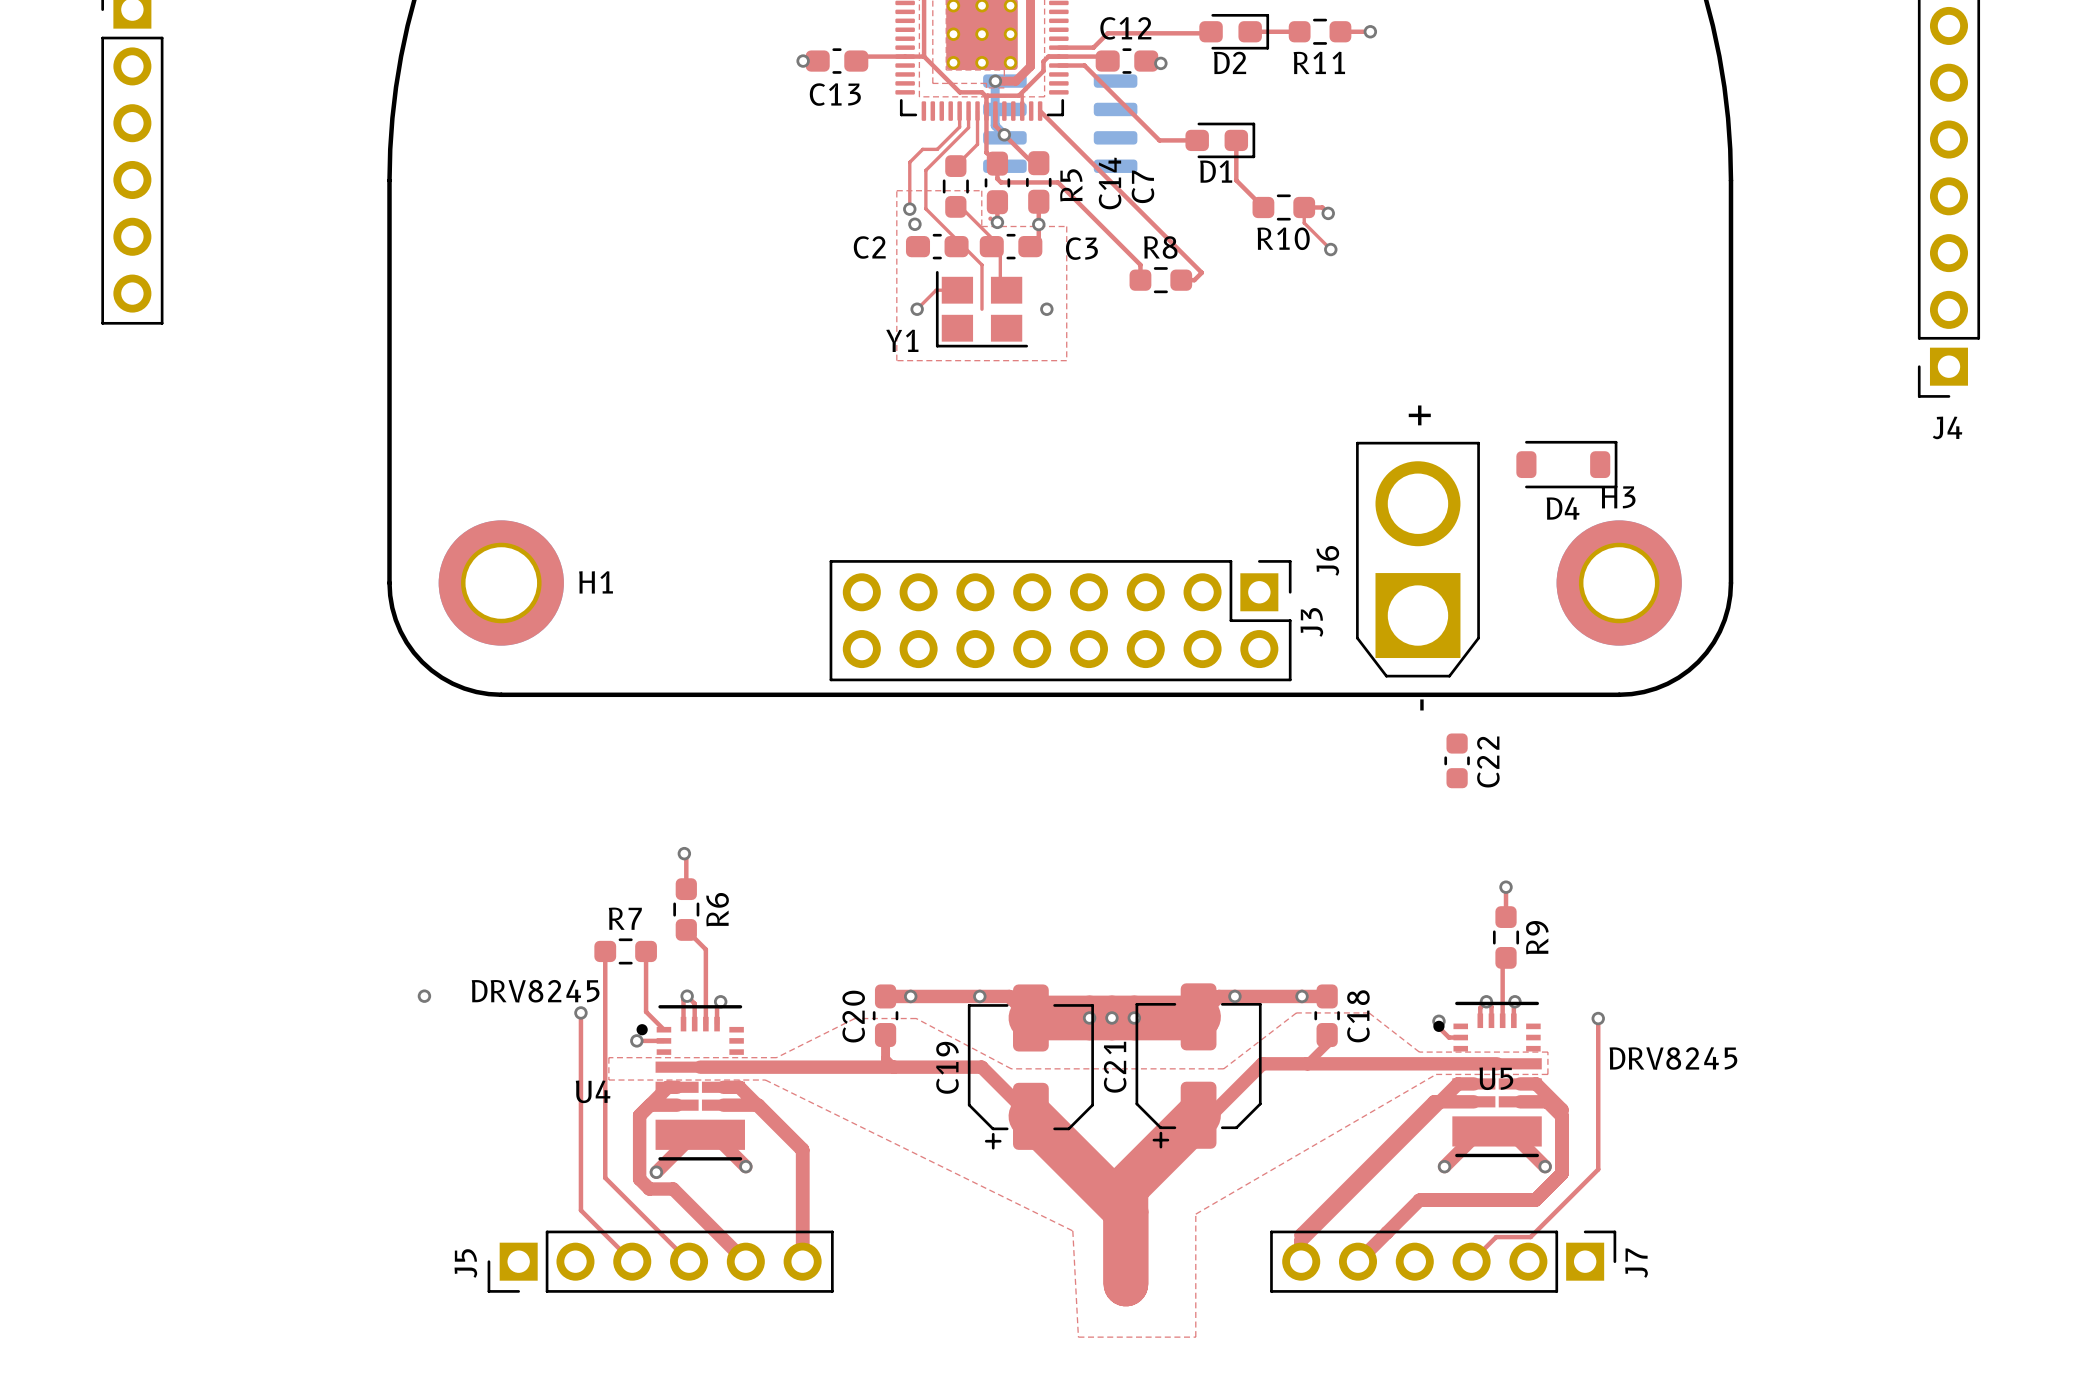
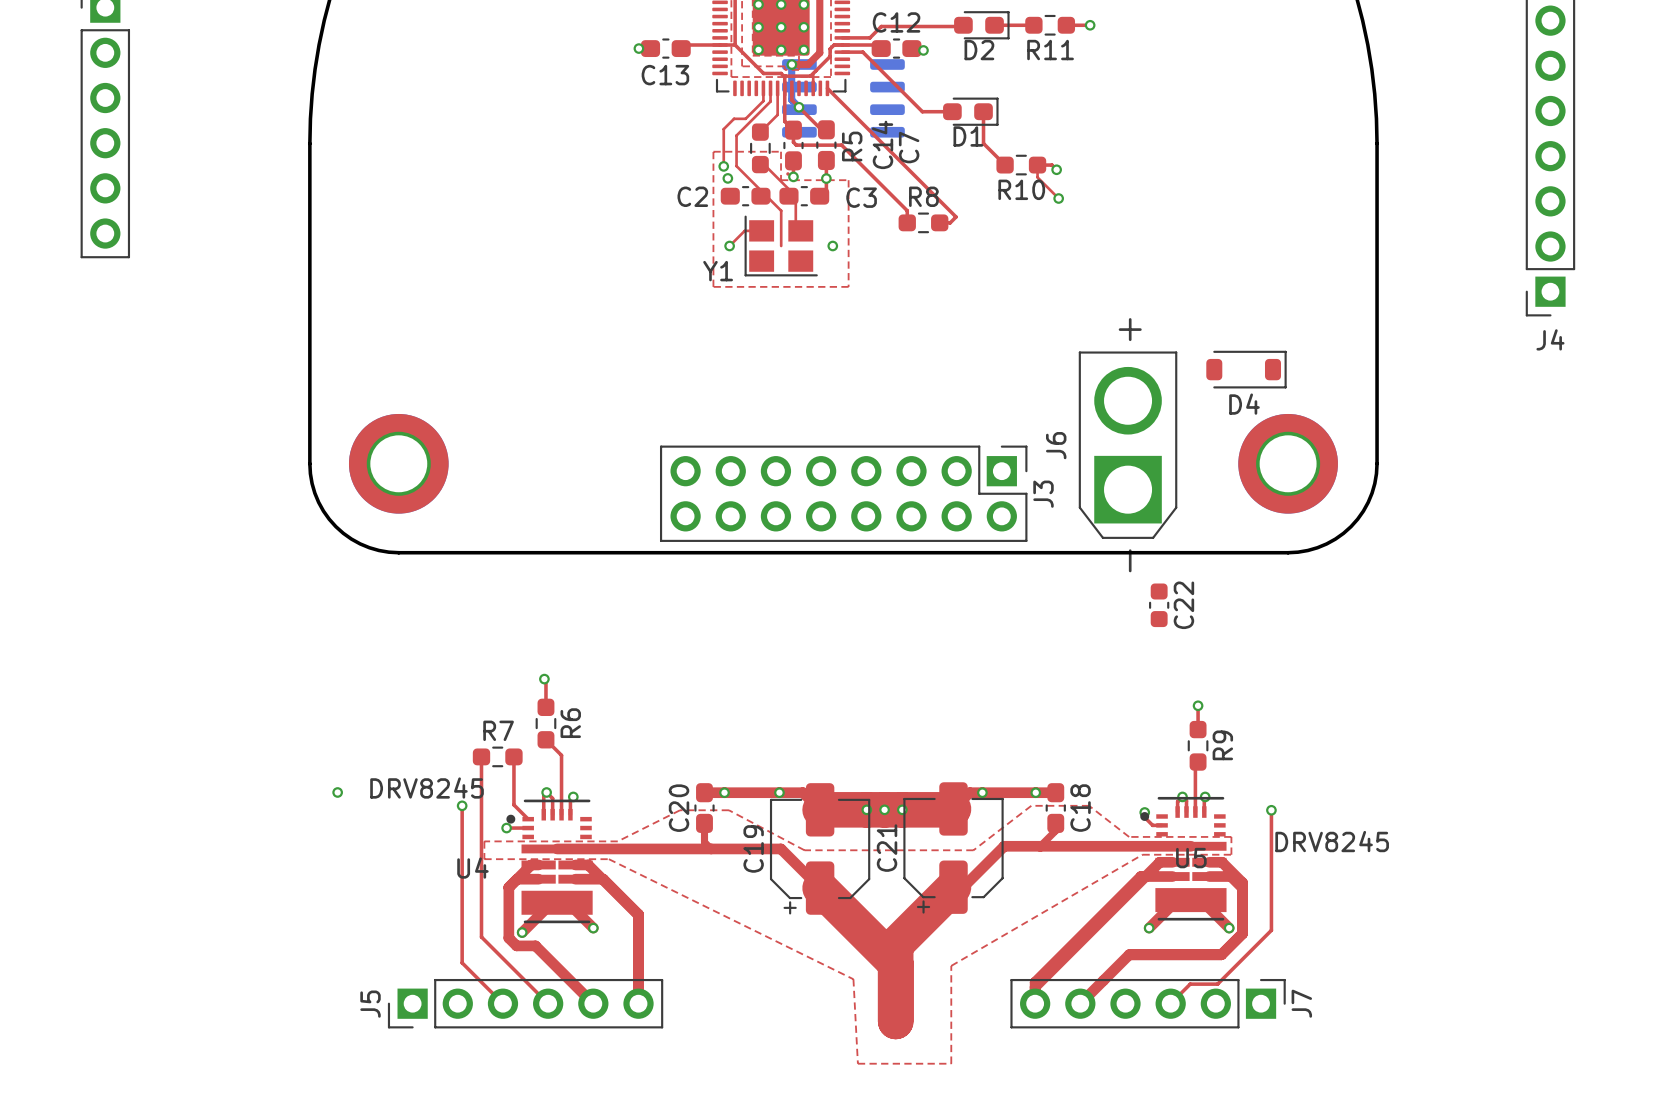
H3 name: H3 (1618, 497) -> none
H1 name: H1 (596, 582) -> none

